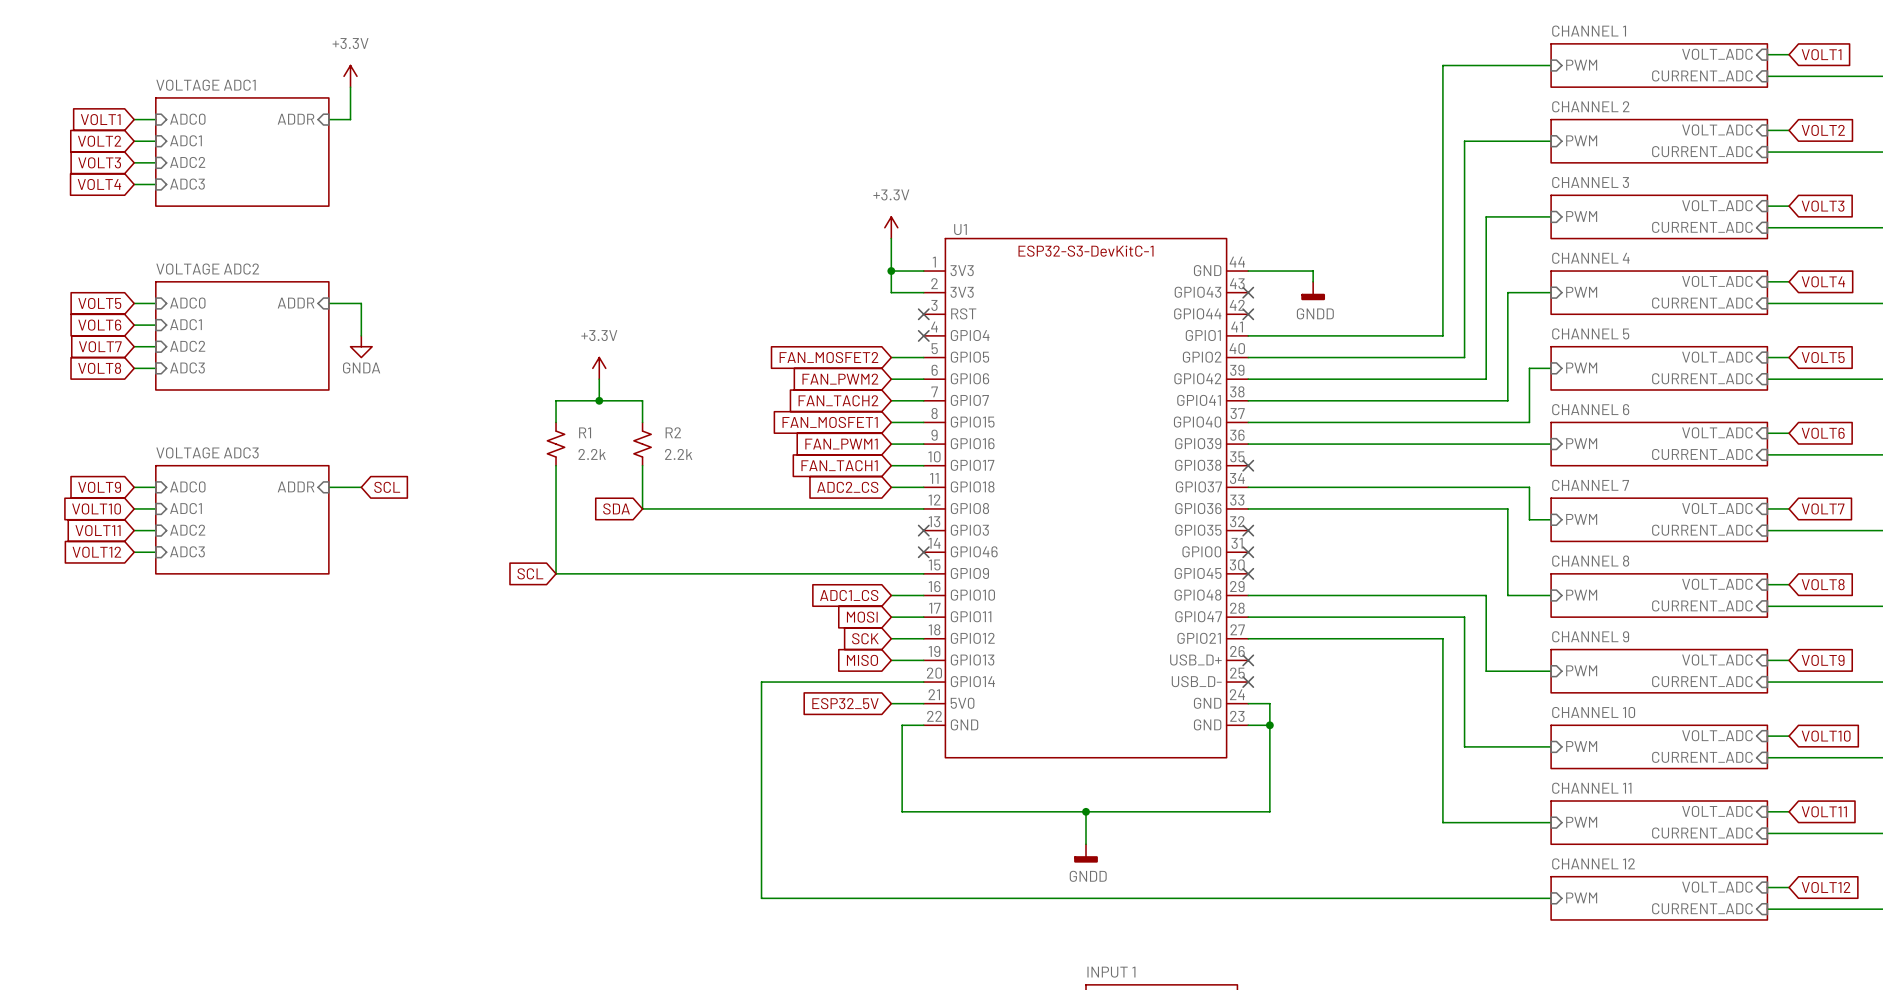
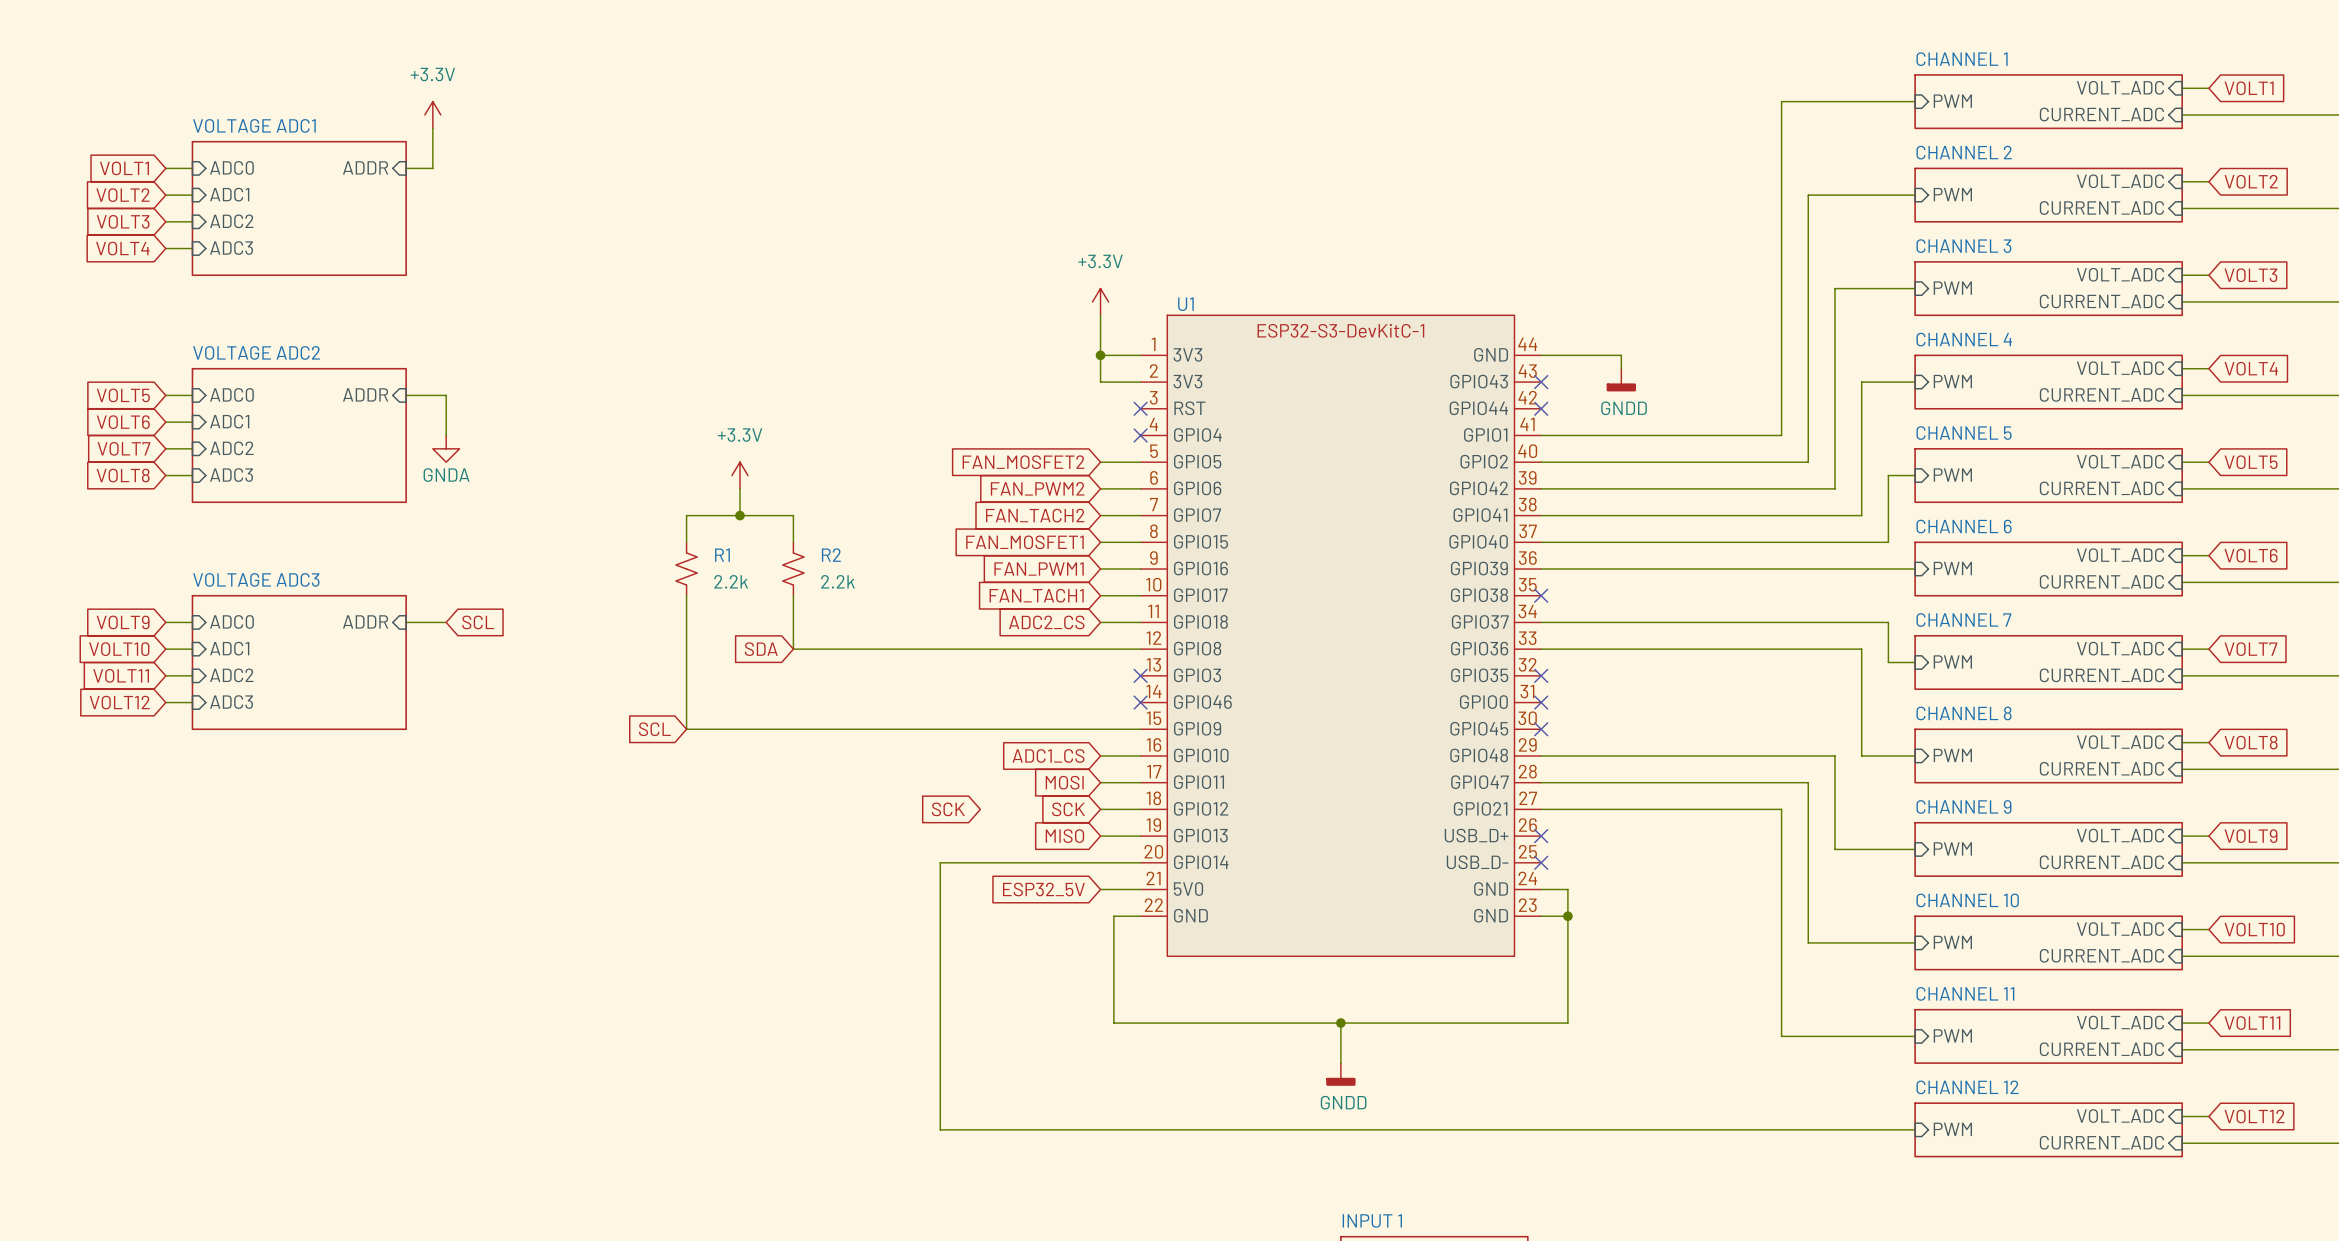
global label: none -> SCK (948, 809)

